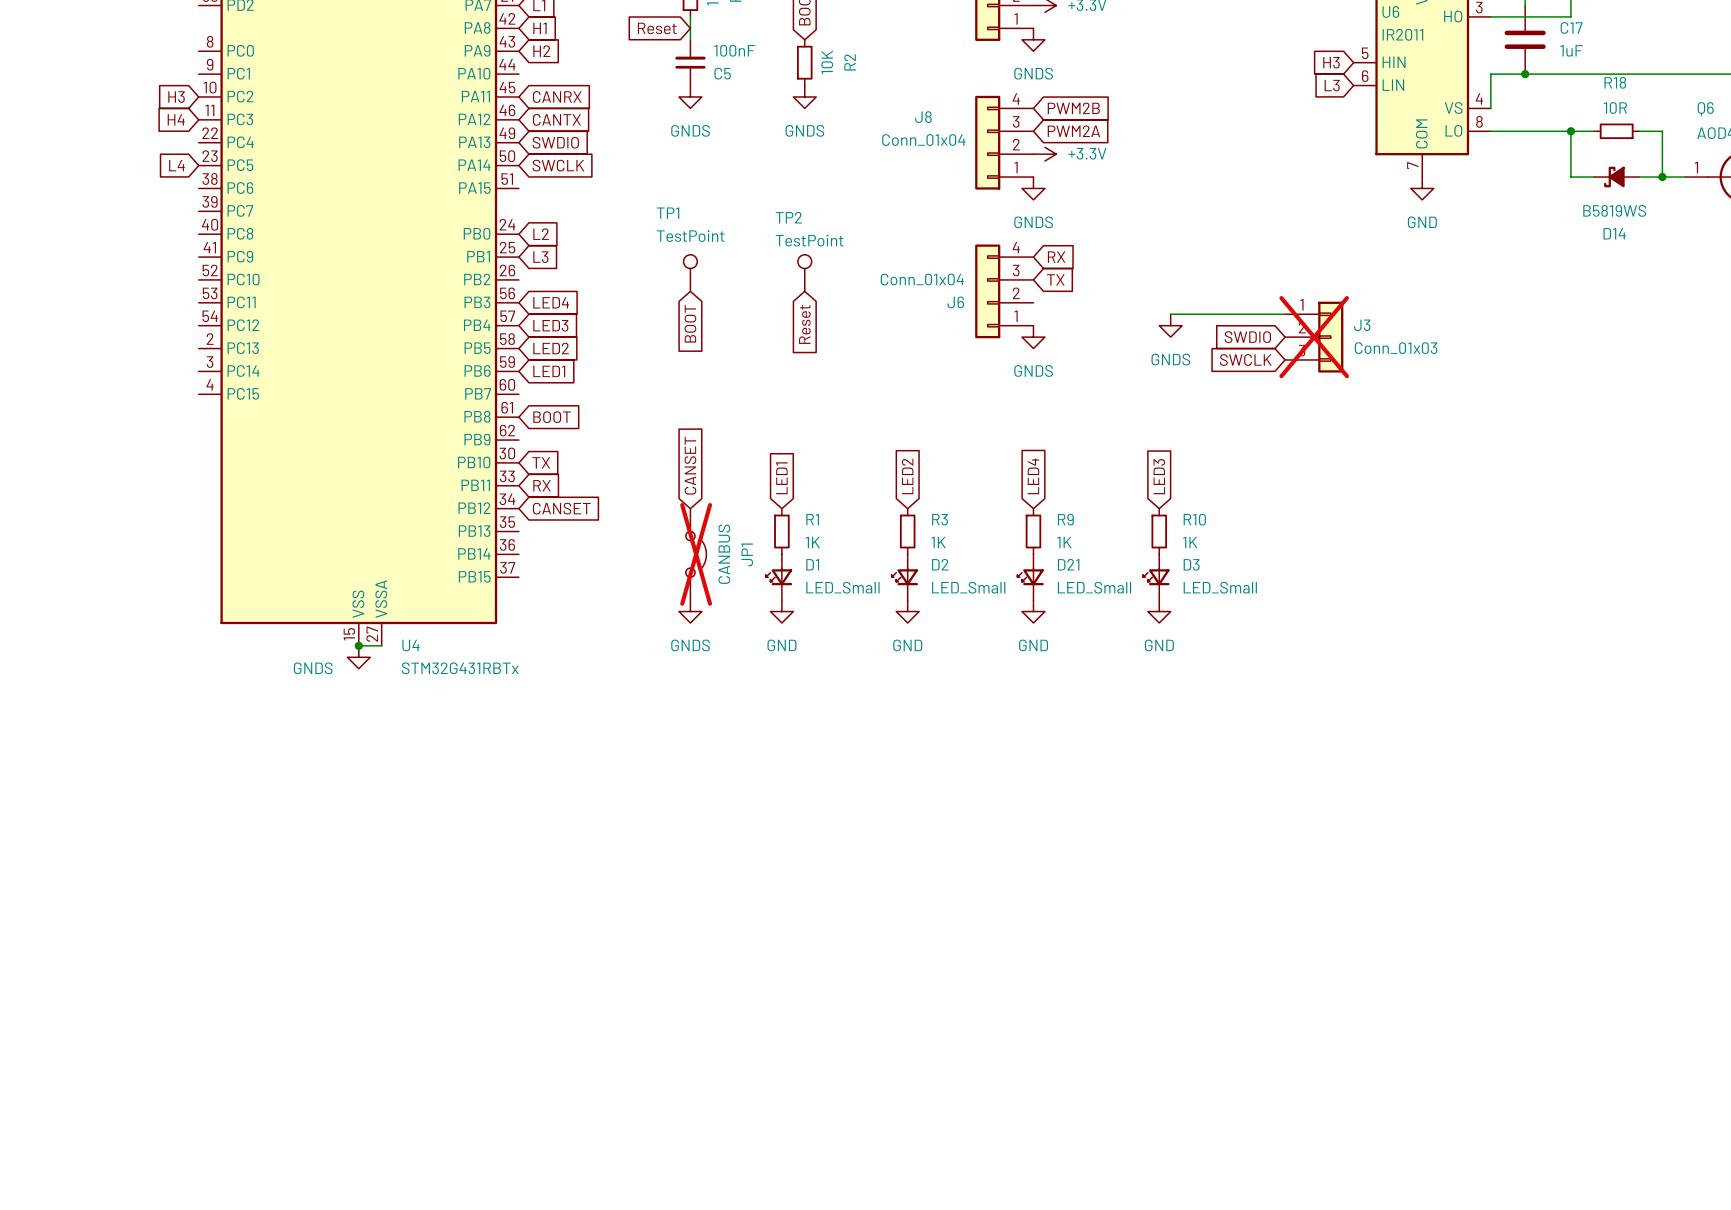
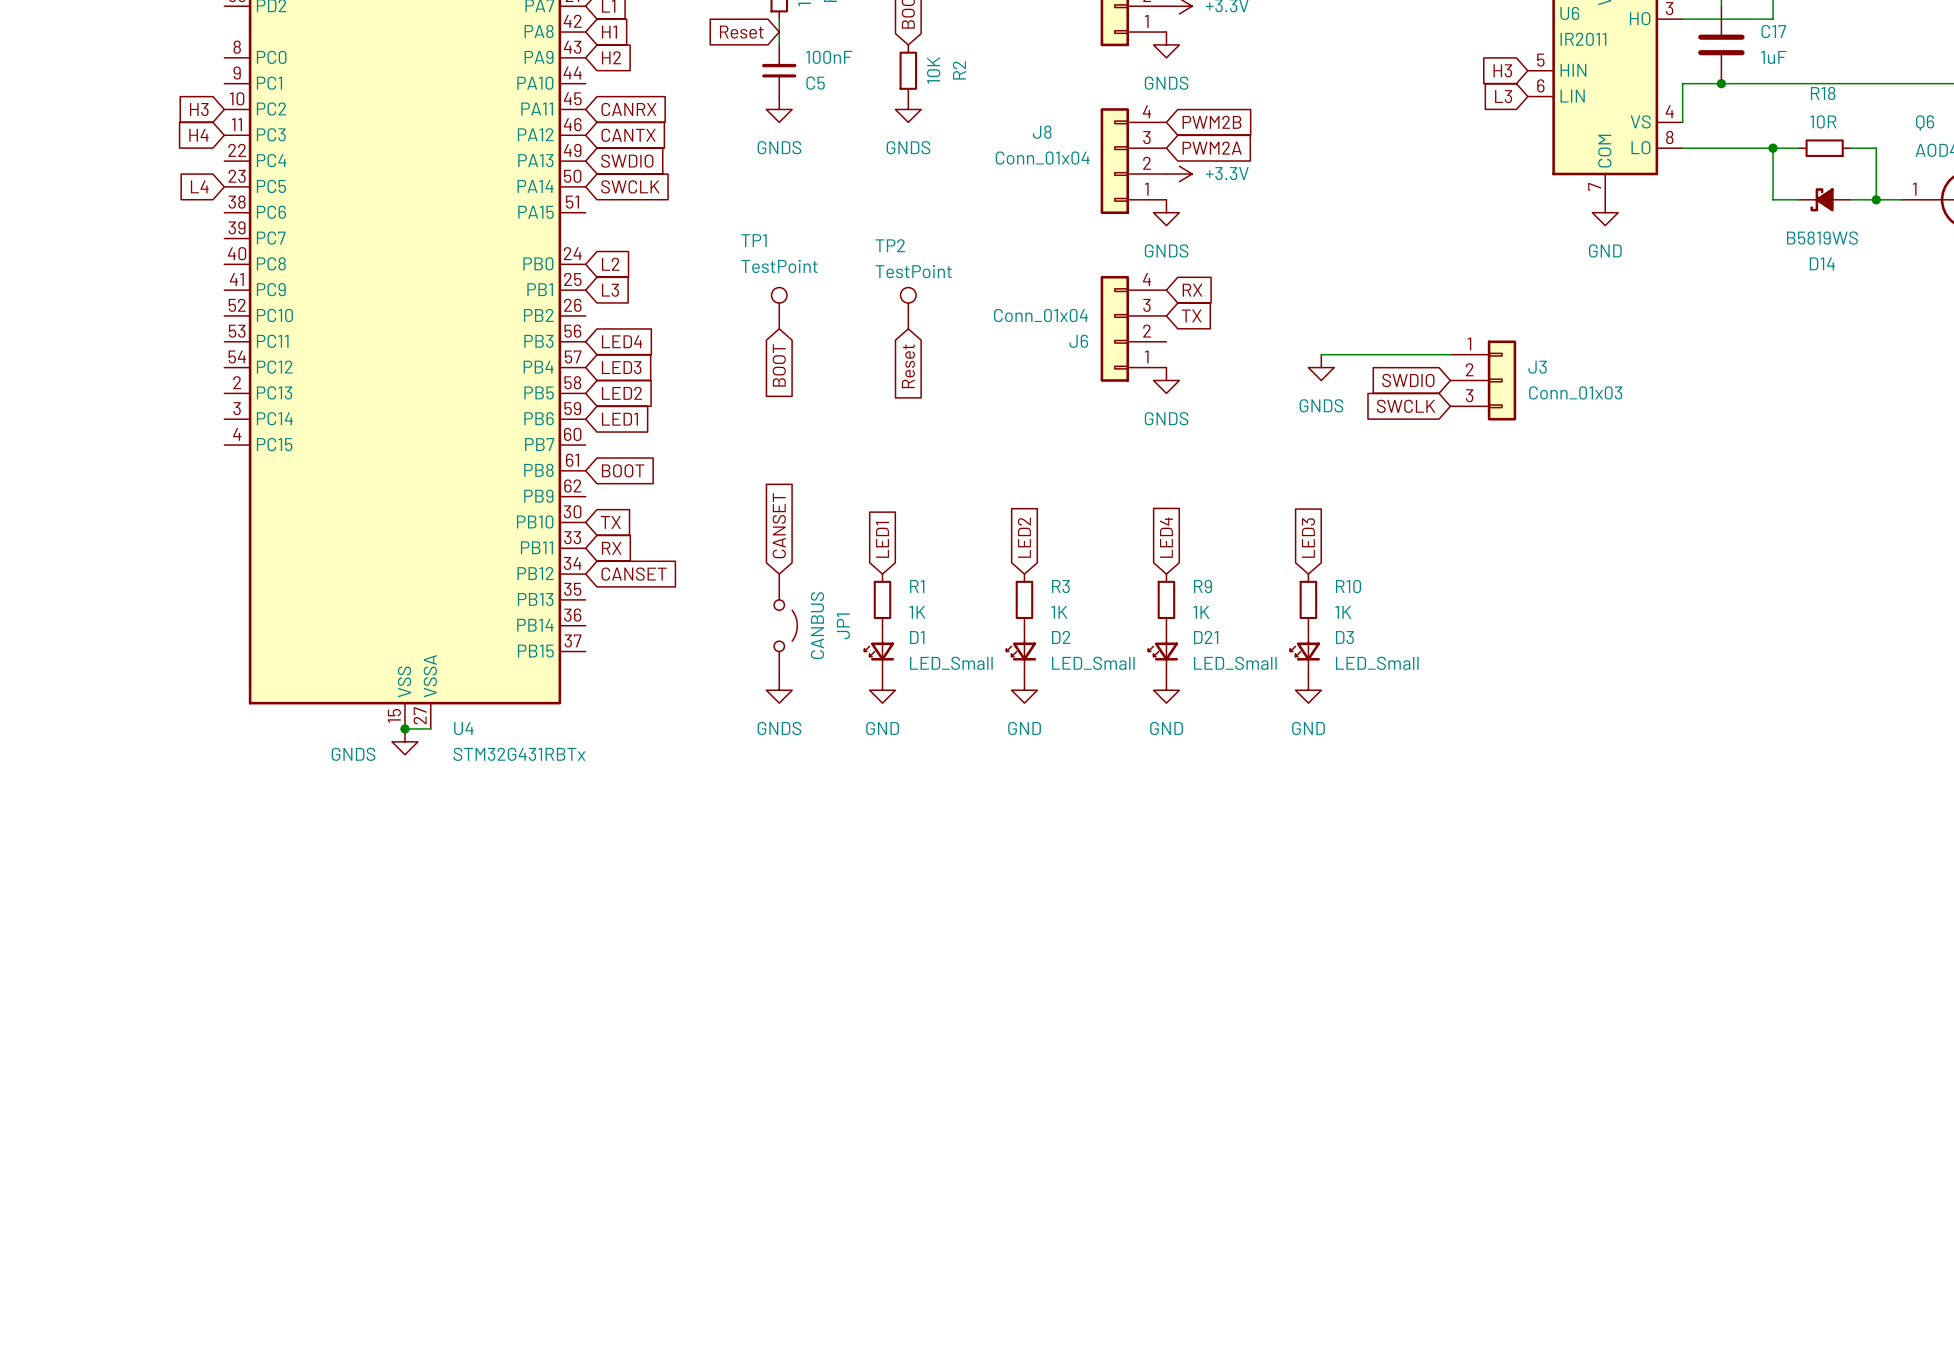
J3 do-not-place cross: (1314, 337) -> none
JP1 do-not-place cross: (696, 554) -> none

